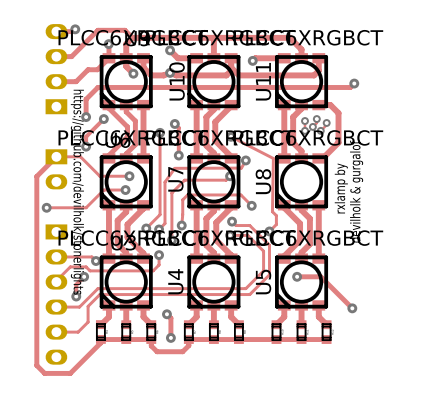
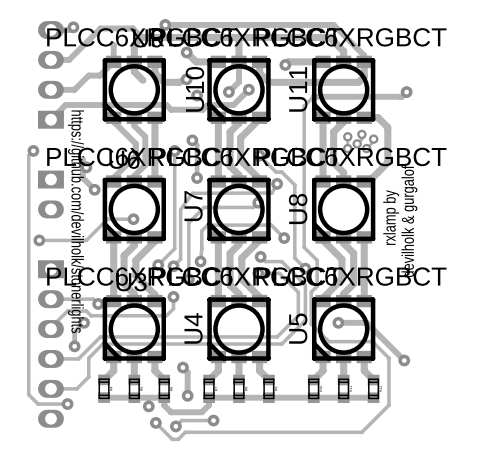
track: none -> (165, 24) (333, 24) (364, 55) (364, 61)
via: none -> (165, 24)
via: (108, 44) -> none
track: none -> (238, 61) (238, 81) (228, 92)
track: (231, 67) (231, 70) (226, 75) (176, 75) (170, 72) -> none
via: (133, 73) -> none
track: none -> (248, 89) (233, 105) (207, 105) (202, 109) (171, 109) (166, 105) (65, 105) (50, 119)
via: none -> (248, 89)
via: none -> (228, 92)
via: none -> (197, 95)
track: (276, 87) (97, 87) (86, 99) (86, 117) -> (313, 96) (304, 106) (304, 247) (317, 260) (317, 286) (311, 292) (311, 323) (328, 341) (372, 341) (388, 358) (388, 405) (361, 432) (185, 432) (178, 439) (172, 439) (155, 422)
via: (86, 117) -> none
track: (103, 119) (86, 136) (86, 146) -> none
via: (103, 119) -> none
track: none -> (33, 150) (28, 155) (28, 394) (38, 404) (67, 404)
via: none -> (33, 150)
track: (231, 136) (273, 158) (272, 211) (276, 215) (276, 224) (269, 231) -> (261, 157) (275, 172) (281, 172) (294, 185) (294, 258) (305, 268)
track: none -> (82, 159) (82, 178) (94, 189)
via: none -> (94, 189)
track: (129, 176) (99, 176) (80, 156) (56, 156) (36, 176) (36, 365) (44, 373) (70, 373) (100, 342) (100, 339) -> none
via: (129, 176) -> none
via: none -> (67, 404)
via: none -> (148, 406)
track: none -> (213, 420) (181, 420) (175, 426)
via: none -> (213, 420)
via: none -> (155, 422)
via: none -> (175, 426)

